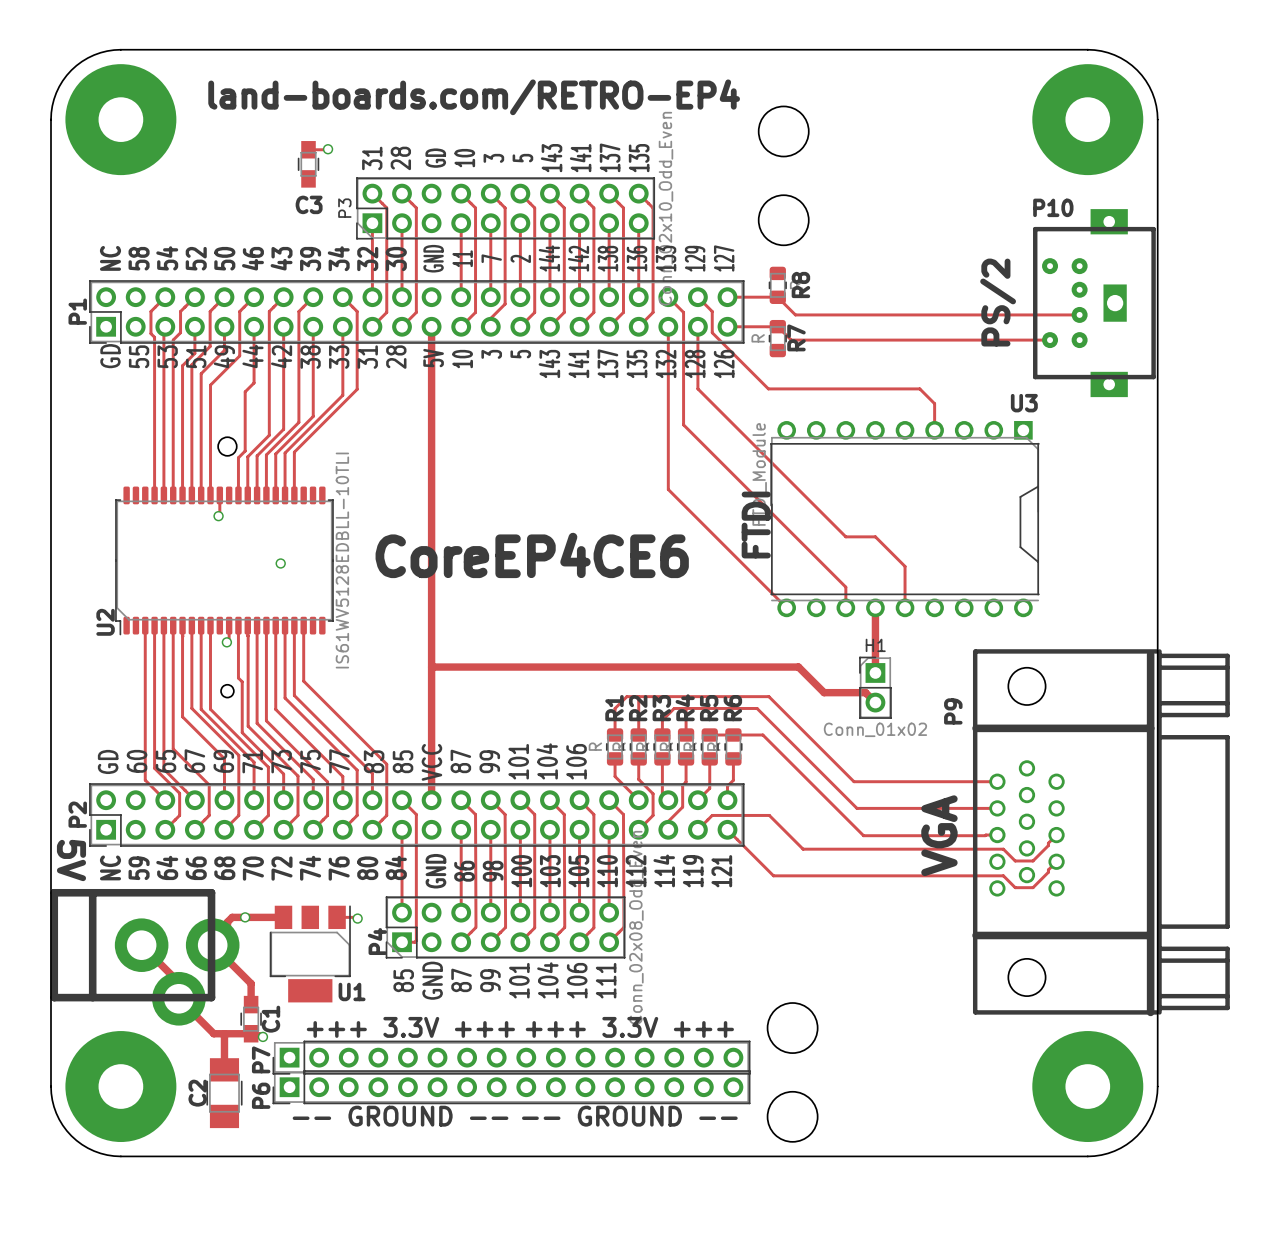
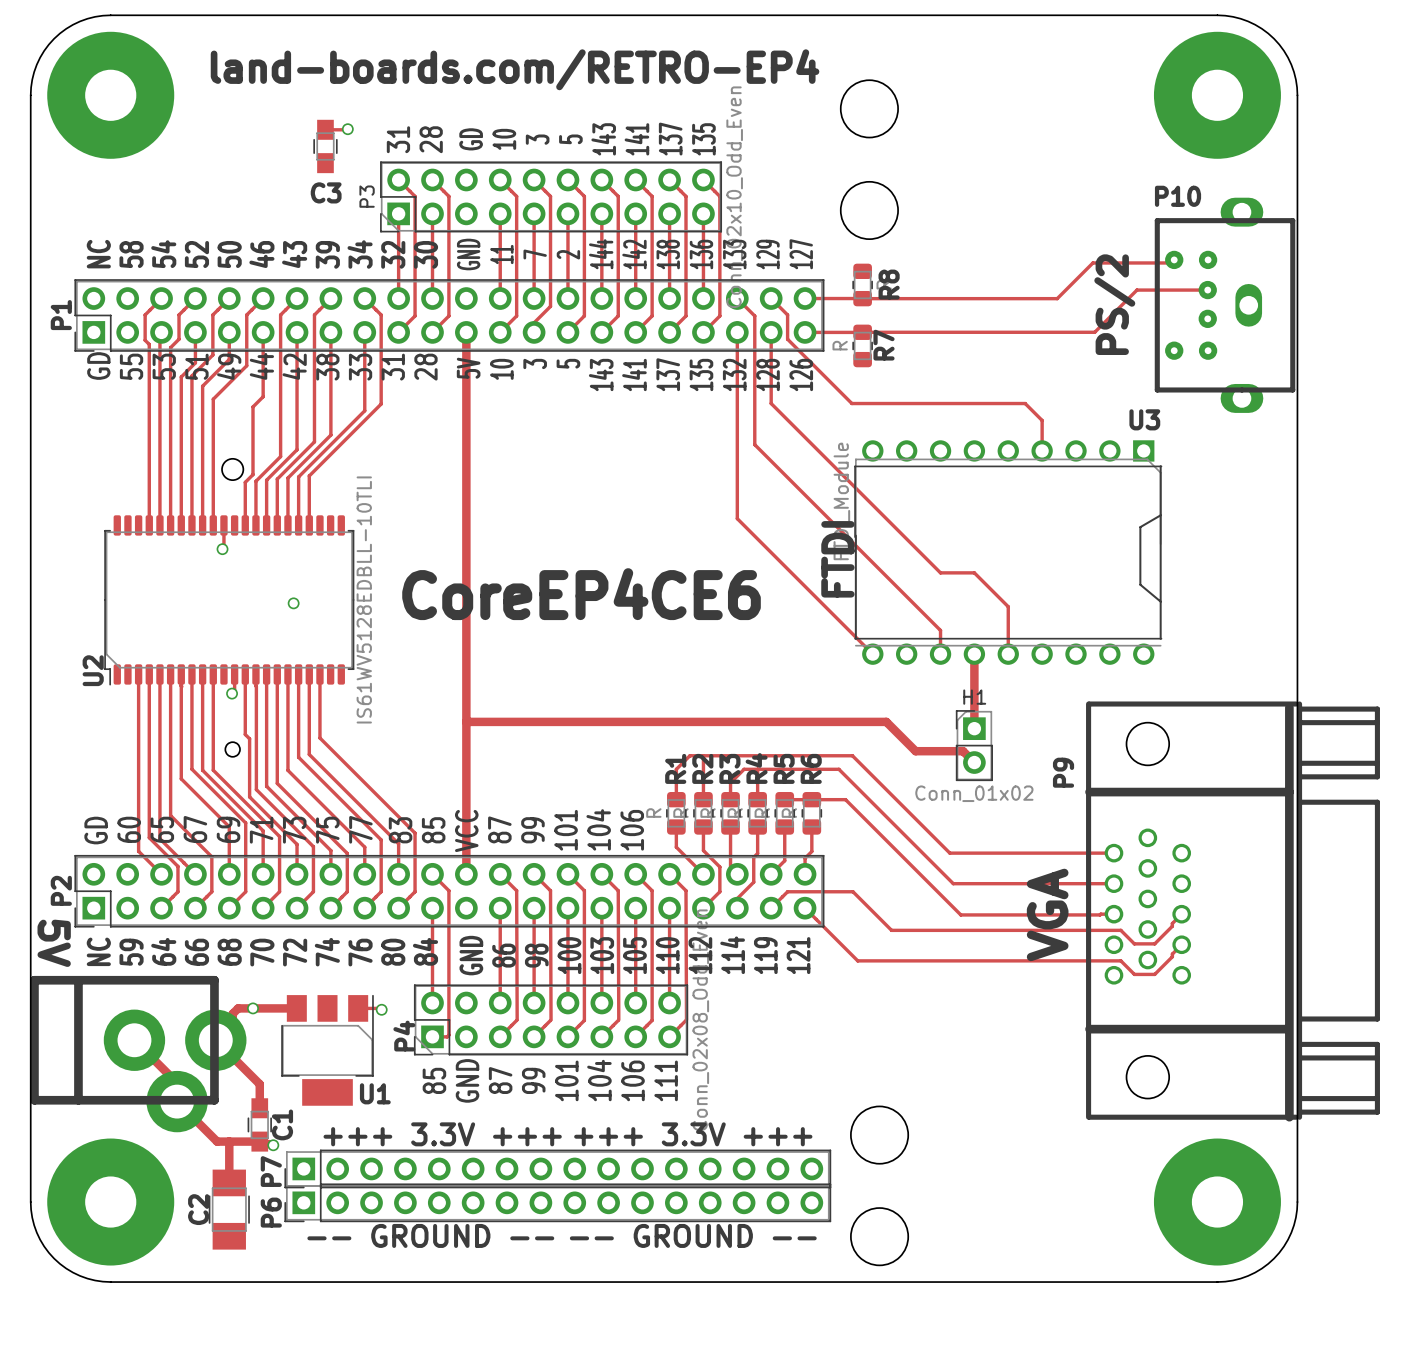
P10 footprint: [1033, 209, 1156, 398] -> [1154, 197, 1296, 413]
track: (777, 297) (795, 314) (1079, 314) -> (862, 298) (1057, 298) (1092, 262) (1174, 262)
track: (777, 326) (791, 340) (1050, 340) -> (862, 332) (1094, 332) (1136, 290) (1208, 290)

